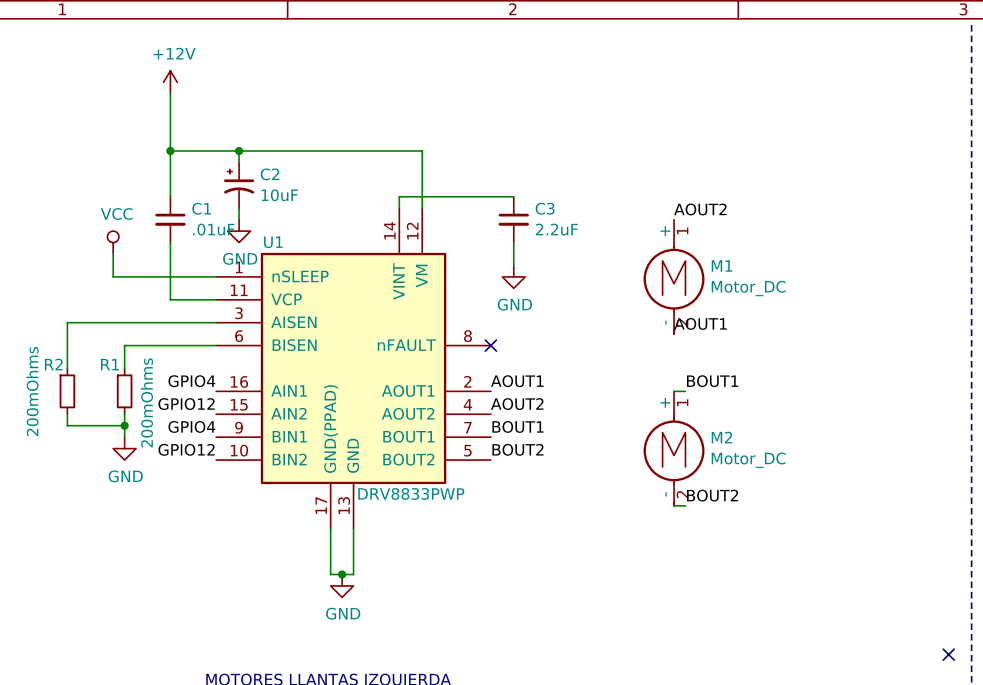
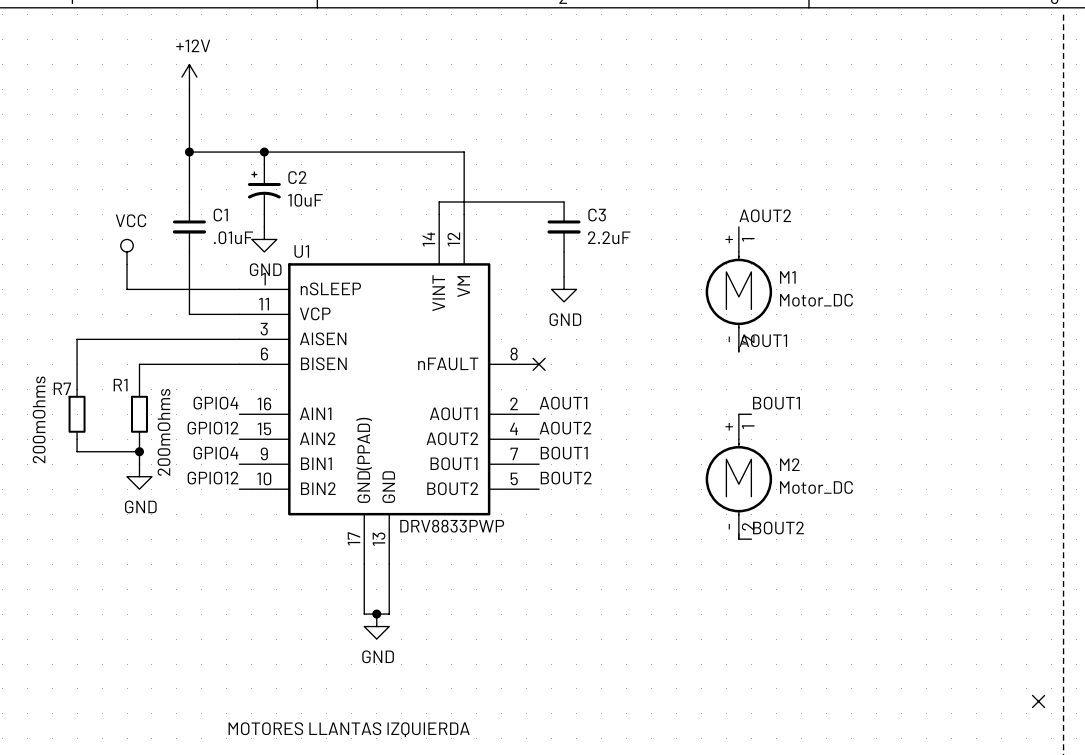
R2 name: R2 (53, 364) -> R7 (62, 388)

